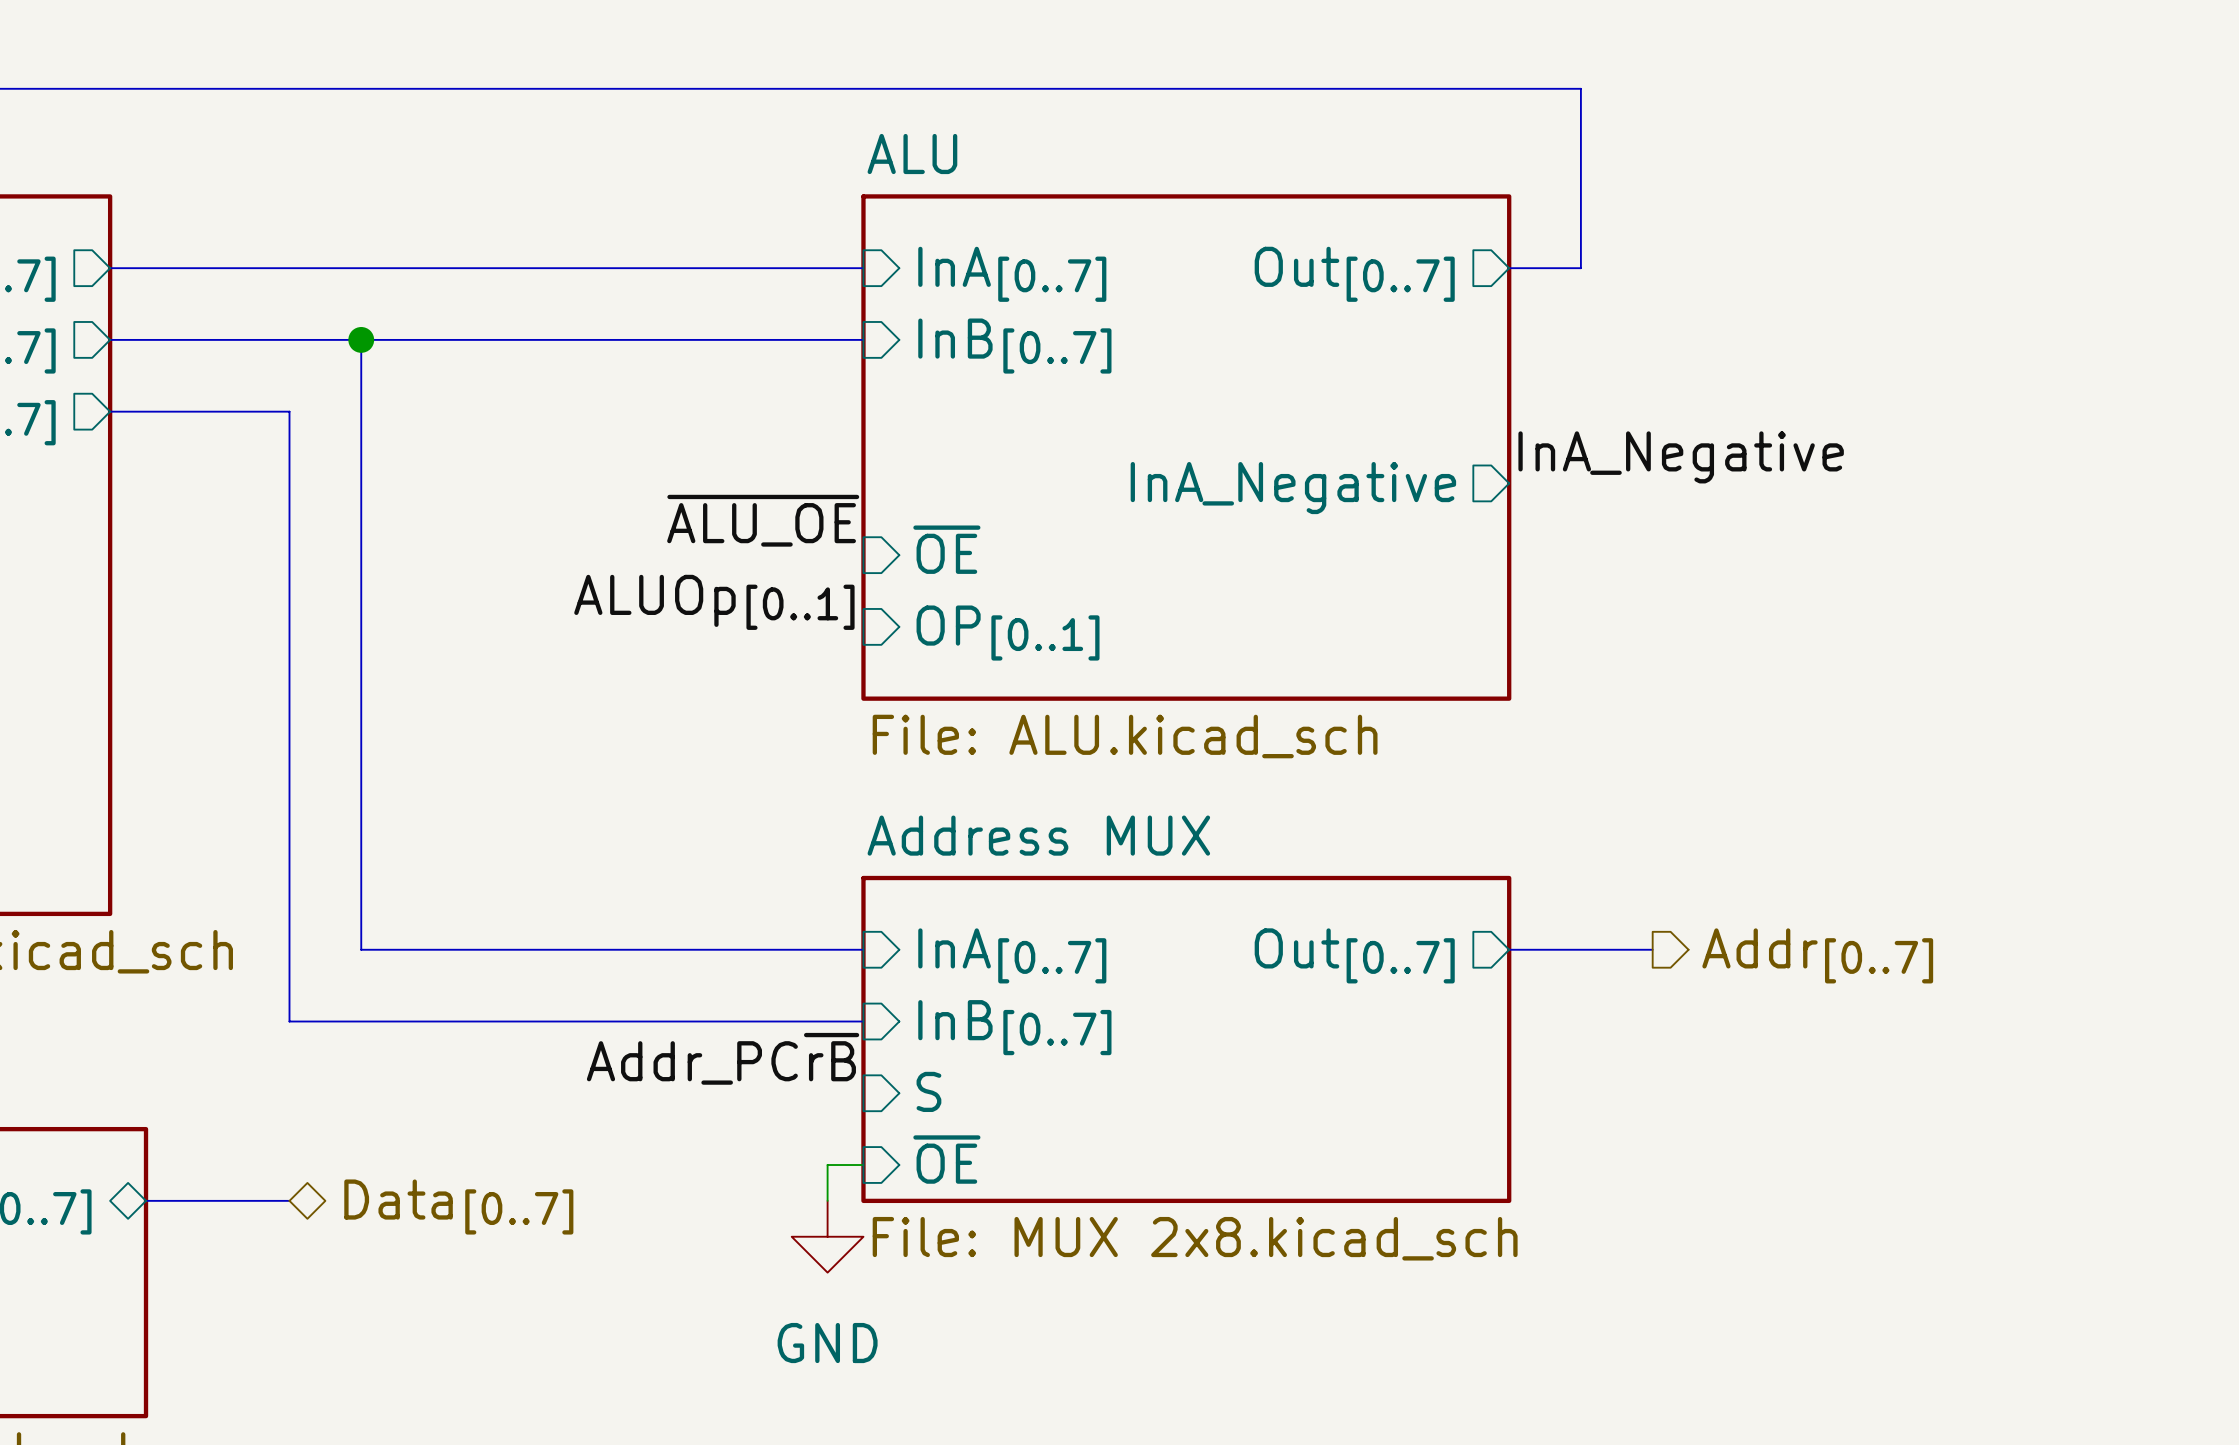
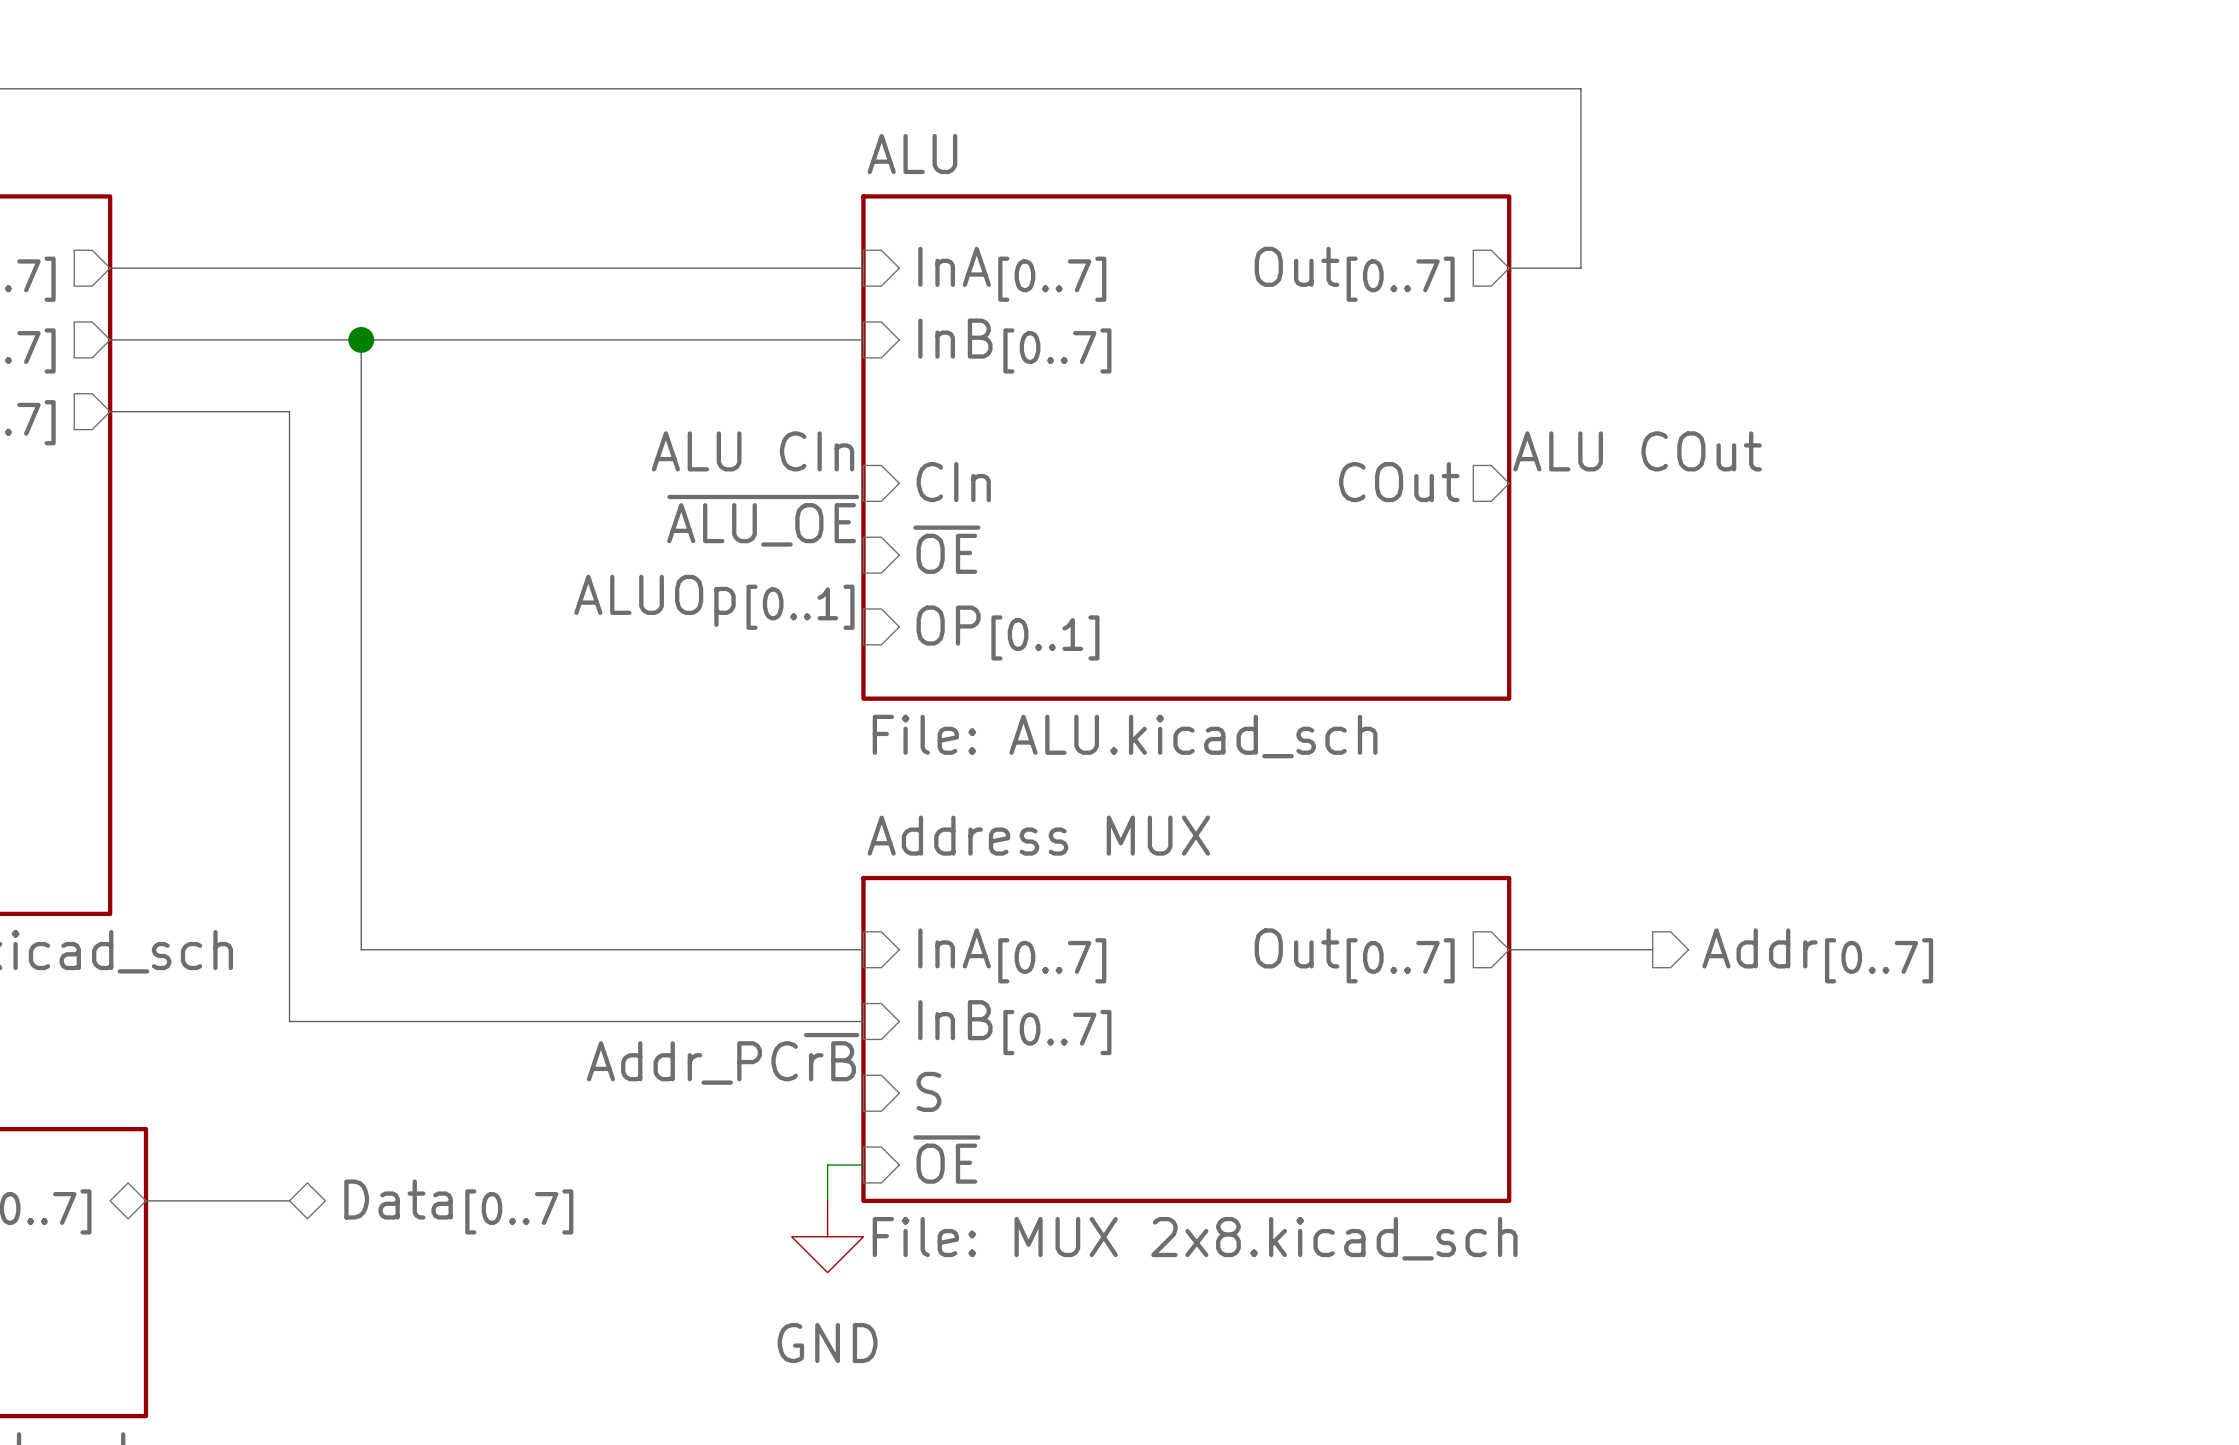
label: none -> ALU CIn (753, 451)
label: InA_Negative (1681, 457) -> ALU COut (1637, 451)
sheet pin: none -> CIn (953, 482)
sheet pin: InA_Negative (1293, 488) -> COut (1399, 482)

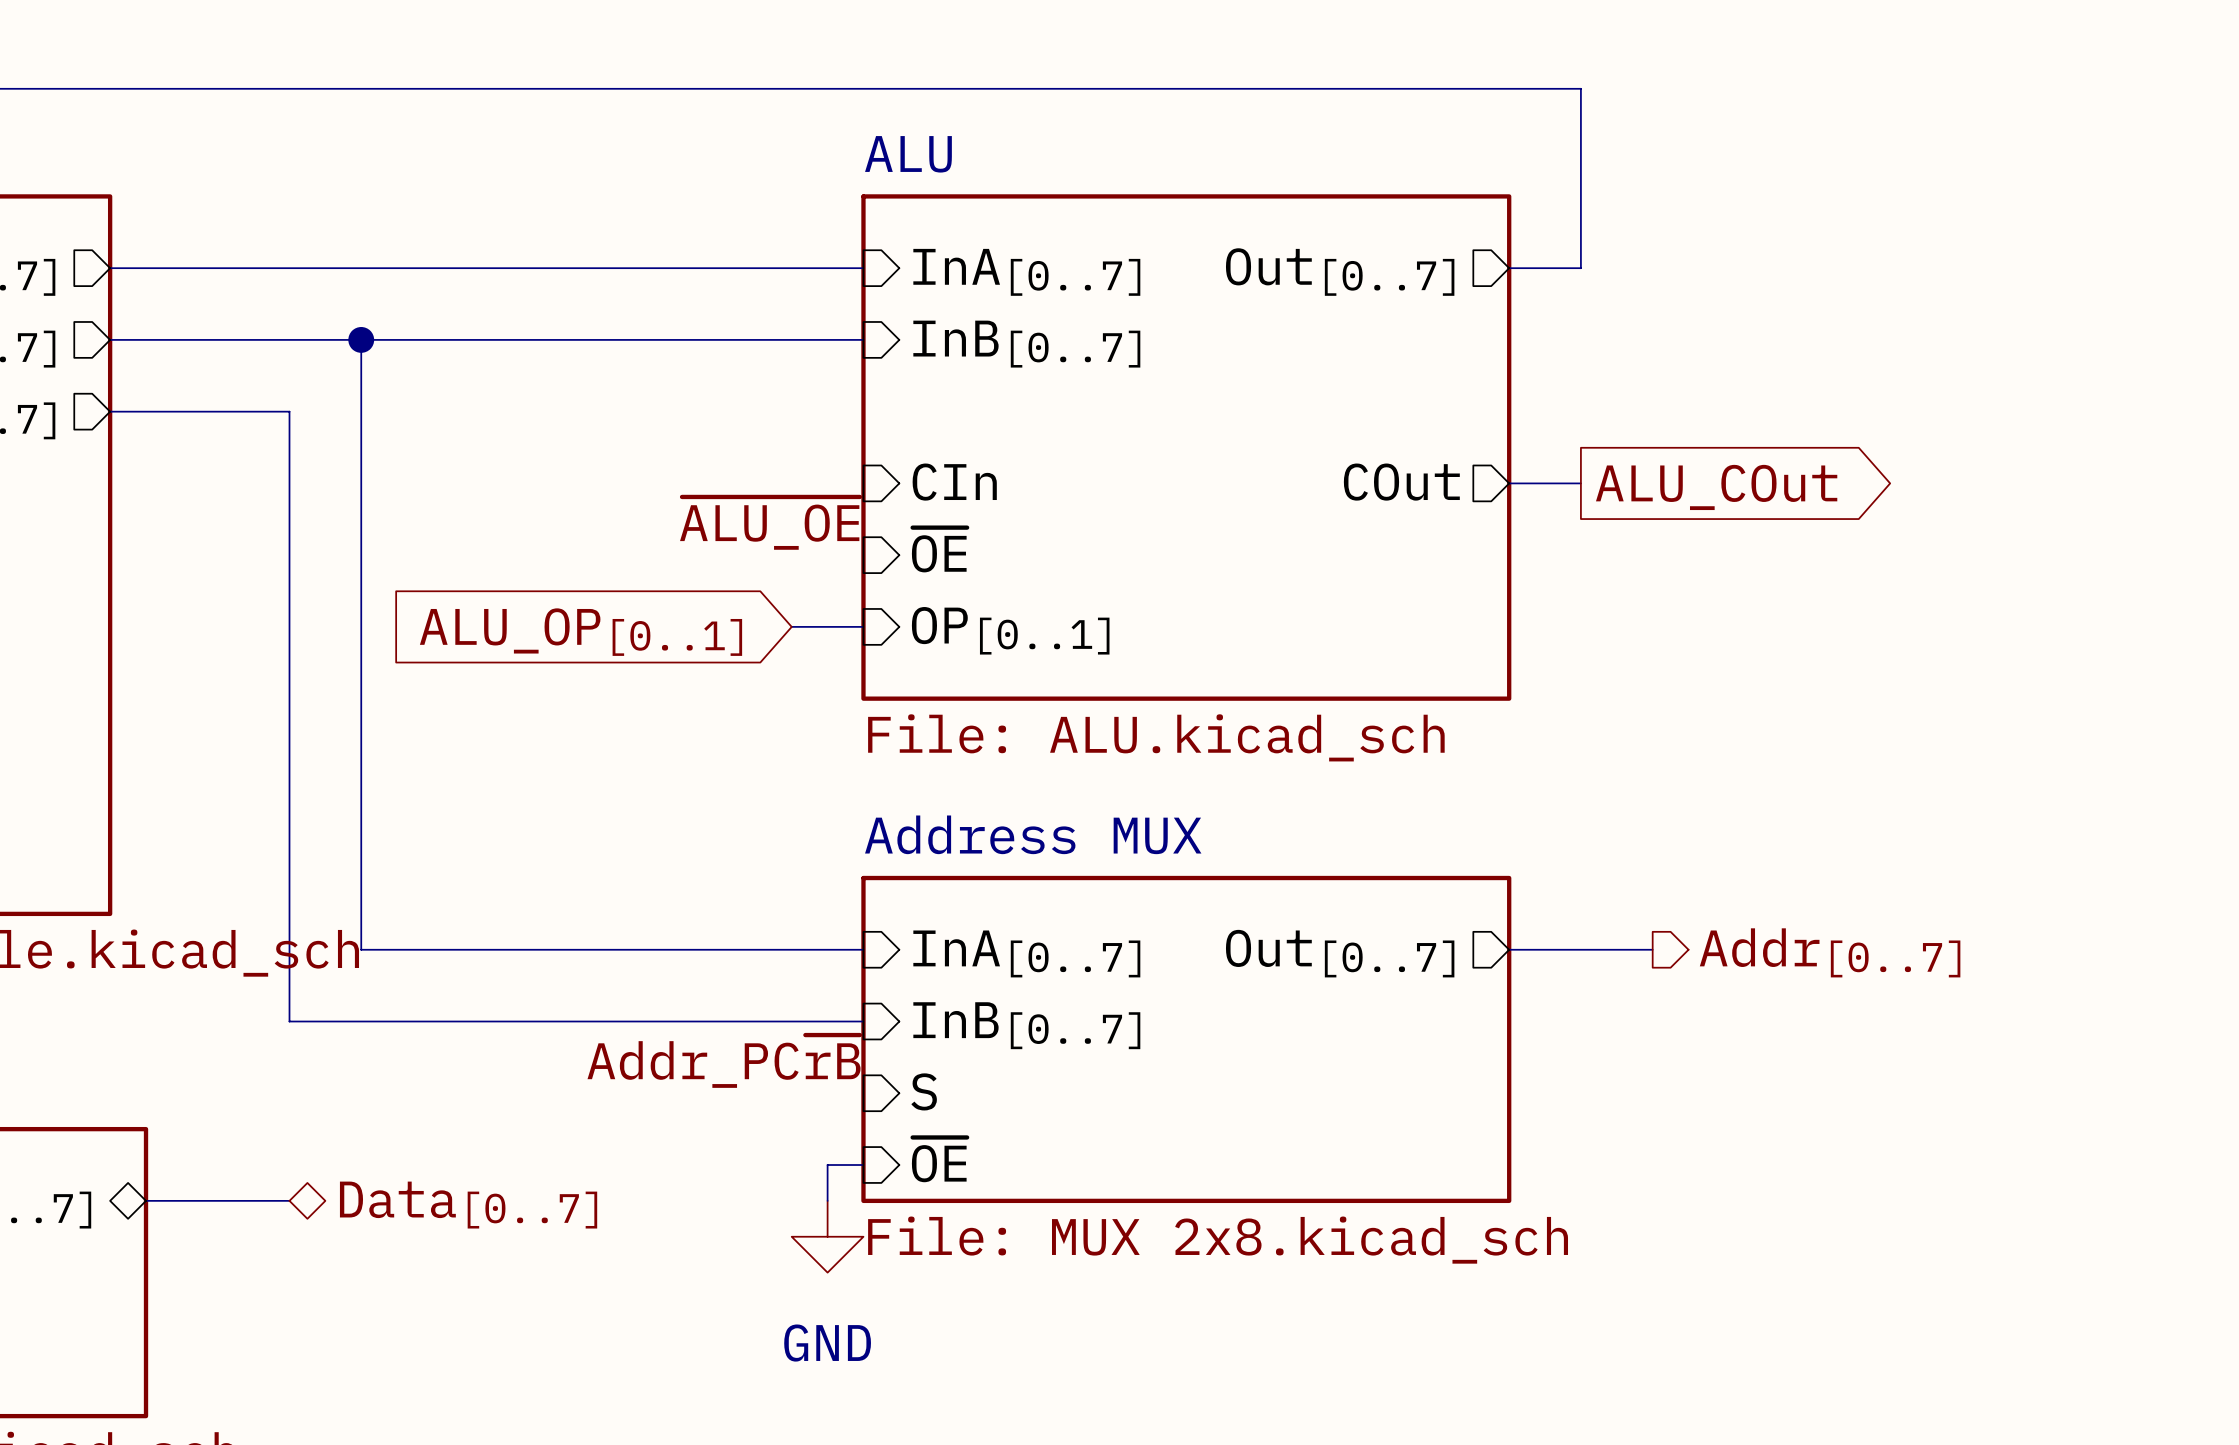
label: ALU CIn (753, 451) -> none
label: ALU COut (1637, 451) -> none
wire: none -> (1509, 483) (1580, 483)
global label: none -> ALU_COut (1716, 487)
label: ALUOp[0..1] (714, 602) -> none
bus: none -> (791, 626) (863, 626)
global label: none -> ALU_OP[0..1] (581, 632)

